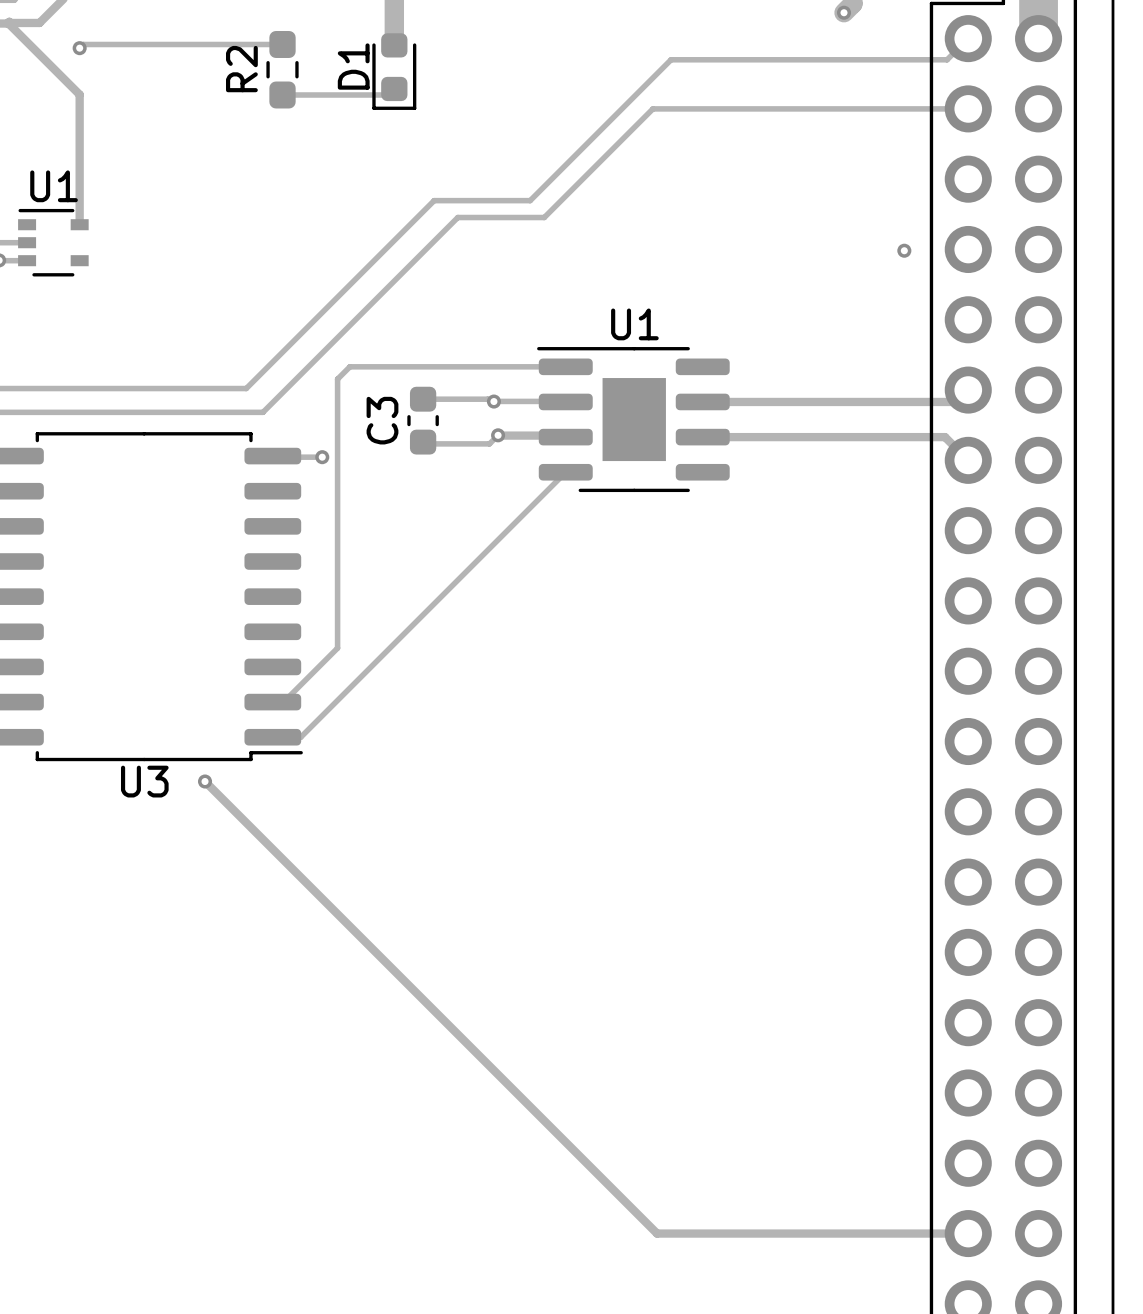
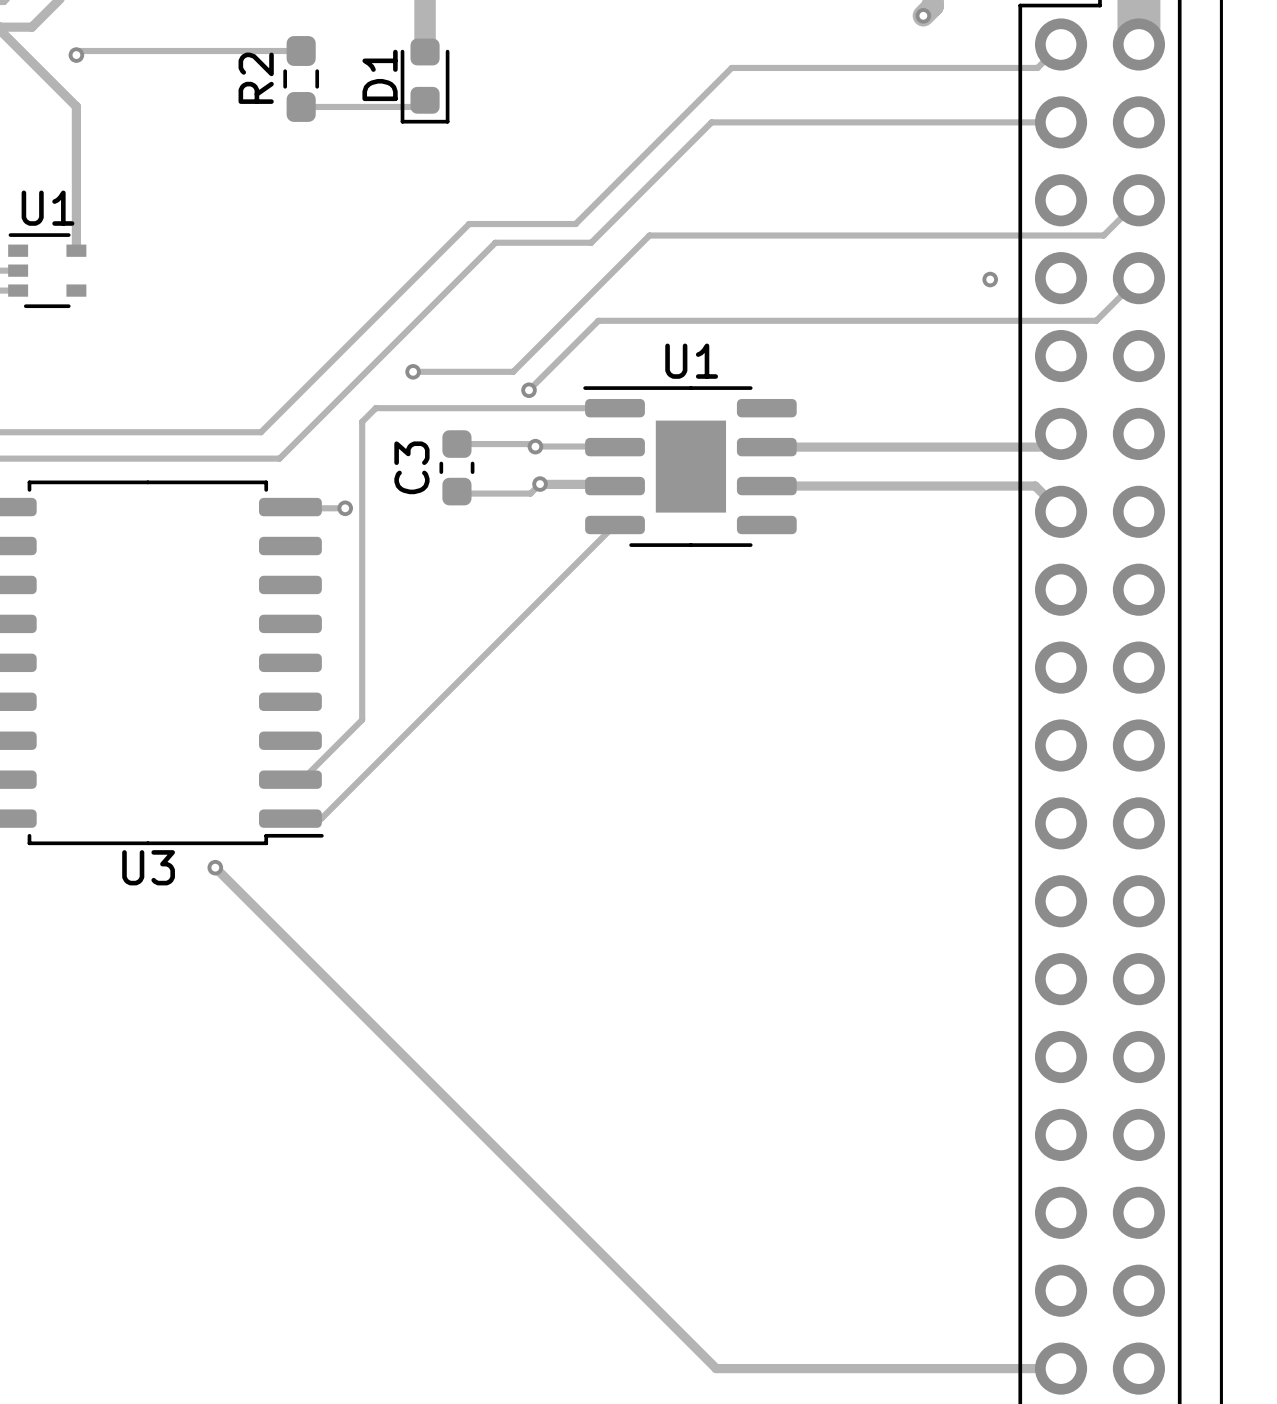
track: none -> (1138, 200) (1103, 235) (649, 235) (513, 371) (413, 371)
track: none -> (1138, 278) (1096, 320) (598, 320) (529, 390)
via: none -> (413, 371)
via: none -> (529, 390)

